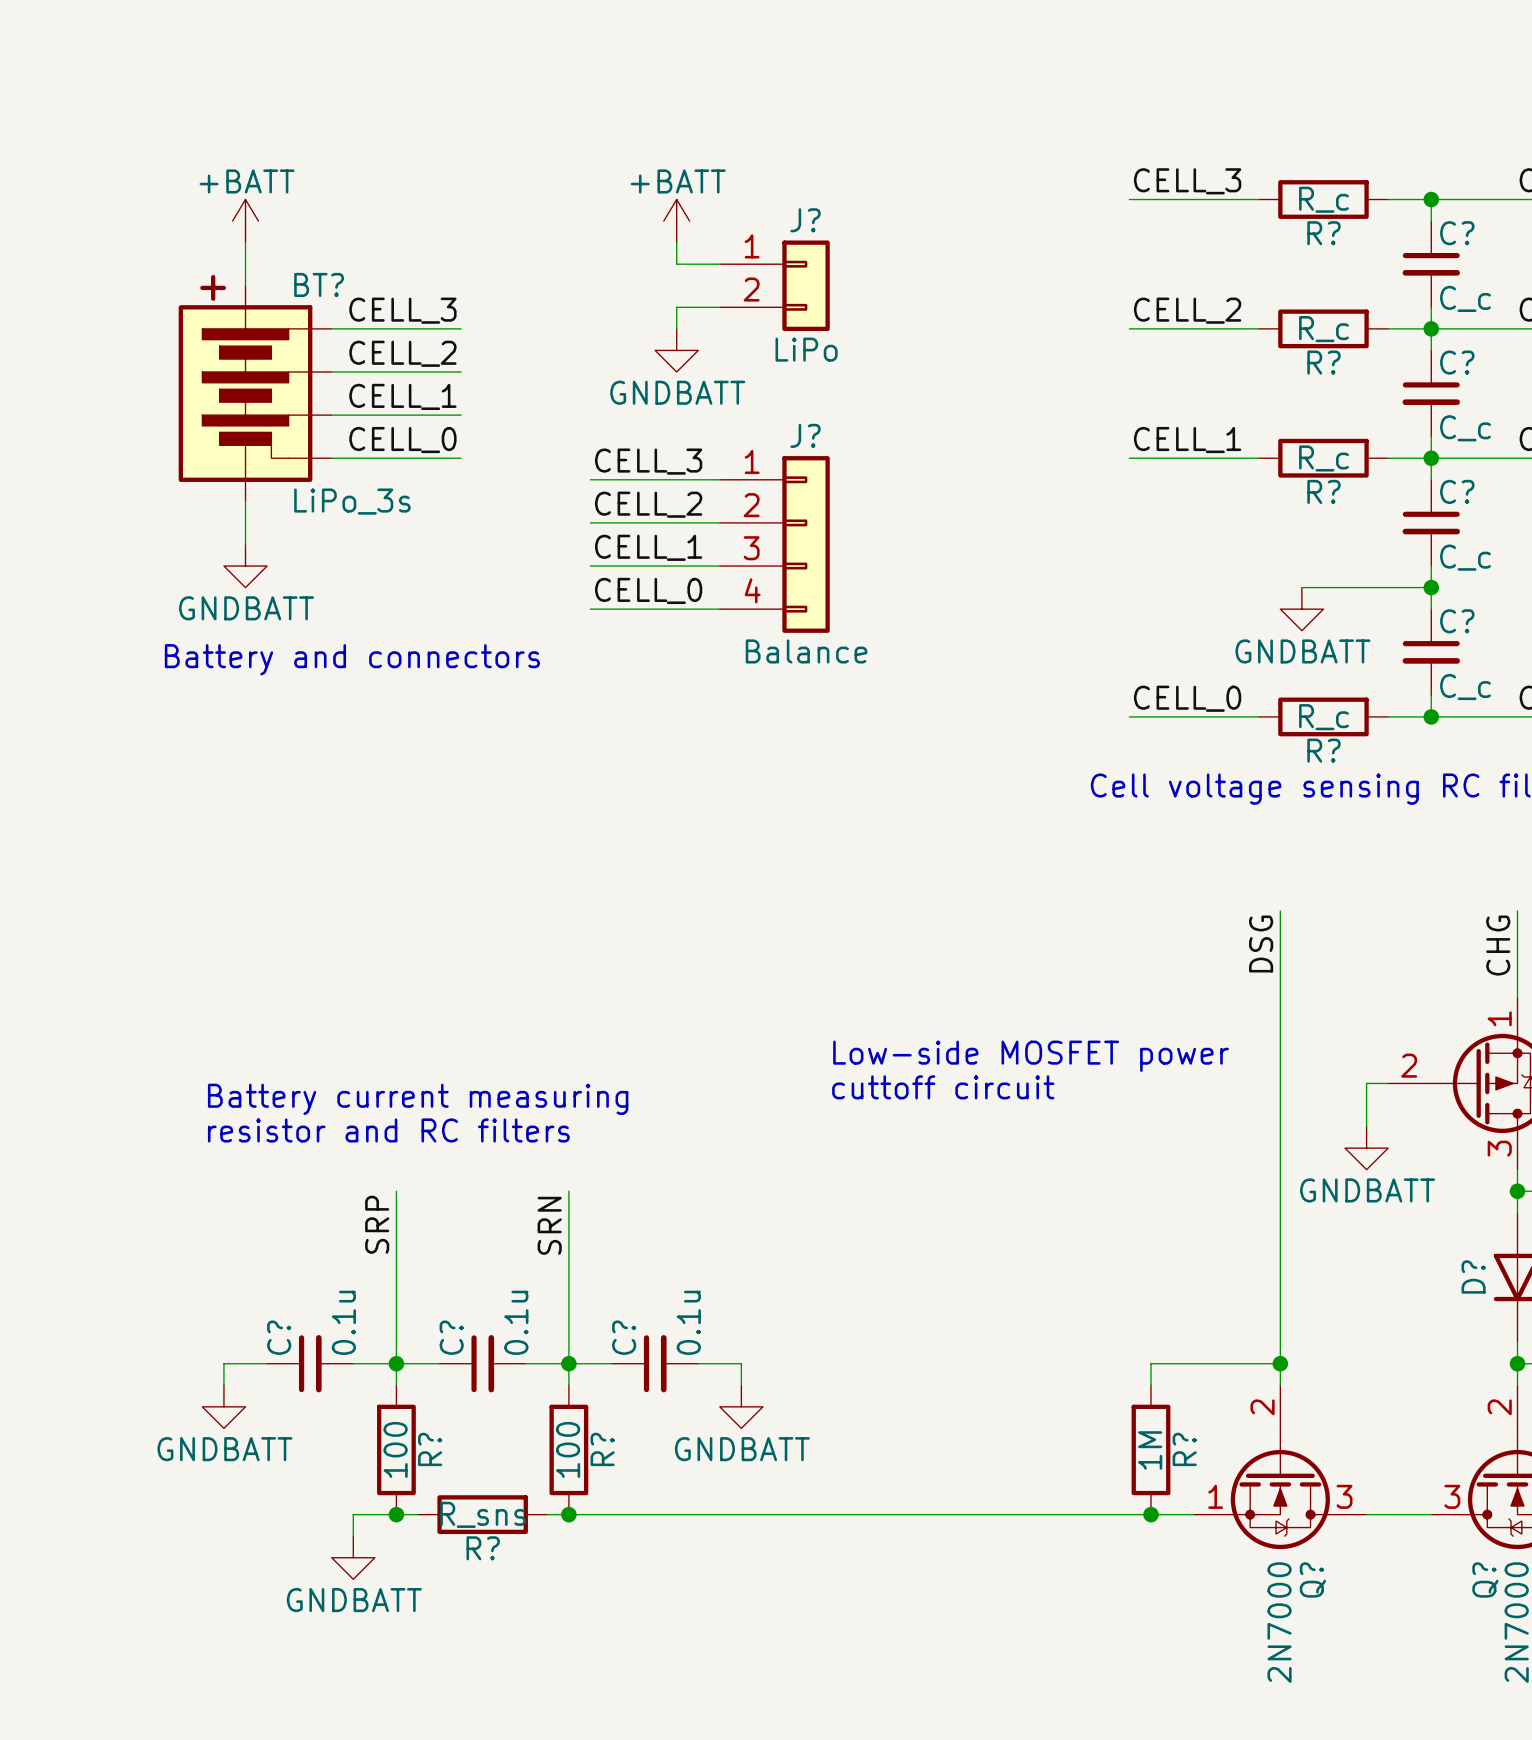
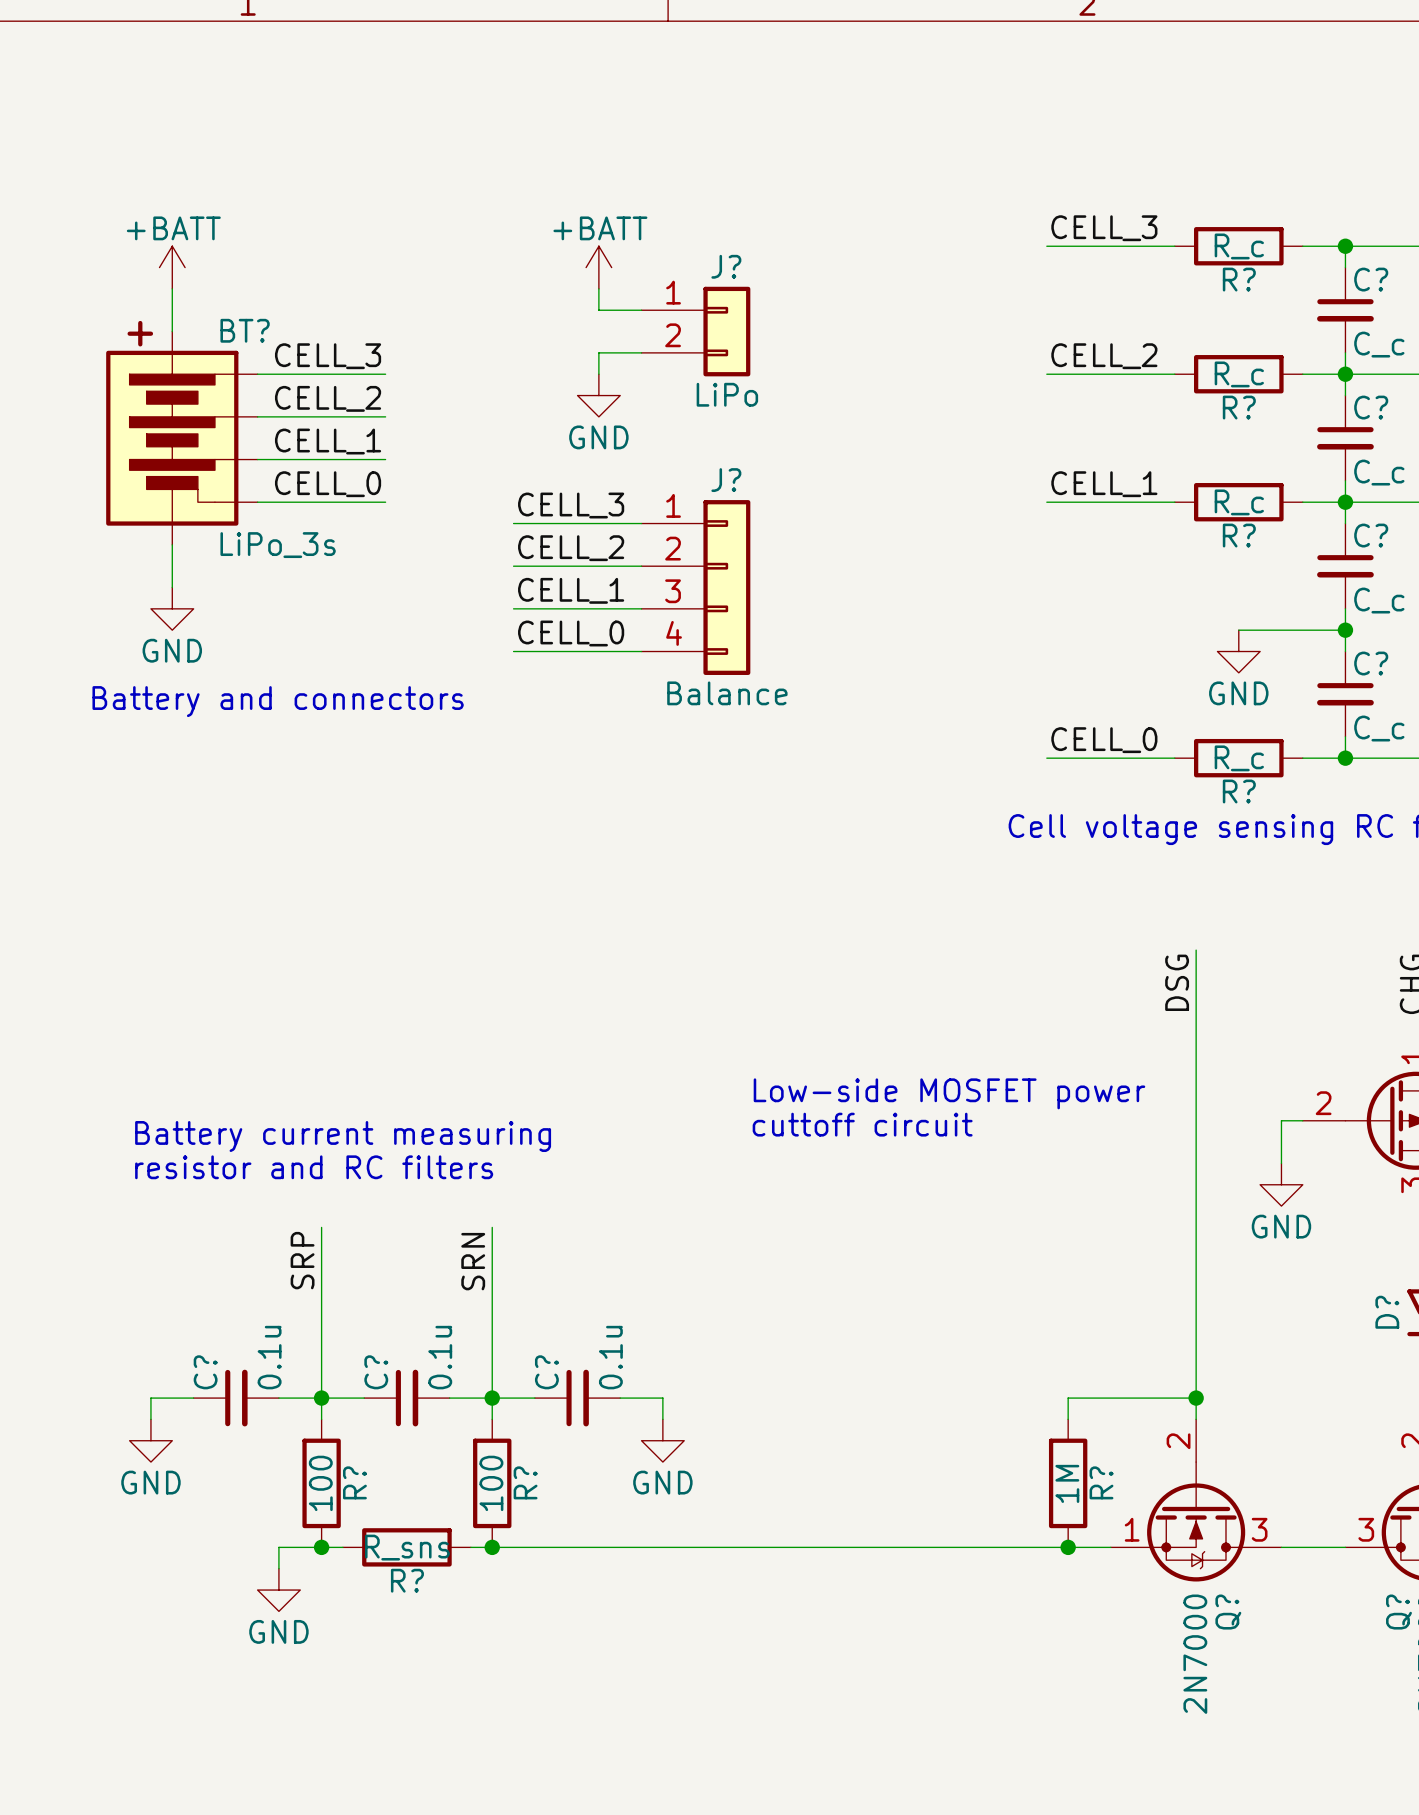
power symbol: GNDBATT (676, 350) -> GND (598, 395)
power symbol: GNDBATT (245, 566) -> GND (172, 608)
wire: (1301, 587) (1323, 587) -> none
power symbol: GNDBATT (1301, 609) -> none
power symbol: none -> GND (1238, 651)
power symbol: GNDBATT (1366, 1148) -> GND (1281, 1184)
power symbol: GNDBATT (223, 1406) -> GND (150, 1440)
power symbol: GNDBATT (741, 1406) -> GND (662, 1440)
power symbol: GNDBATT (353, 1557) -> GND (278, 1590)

